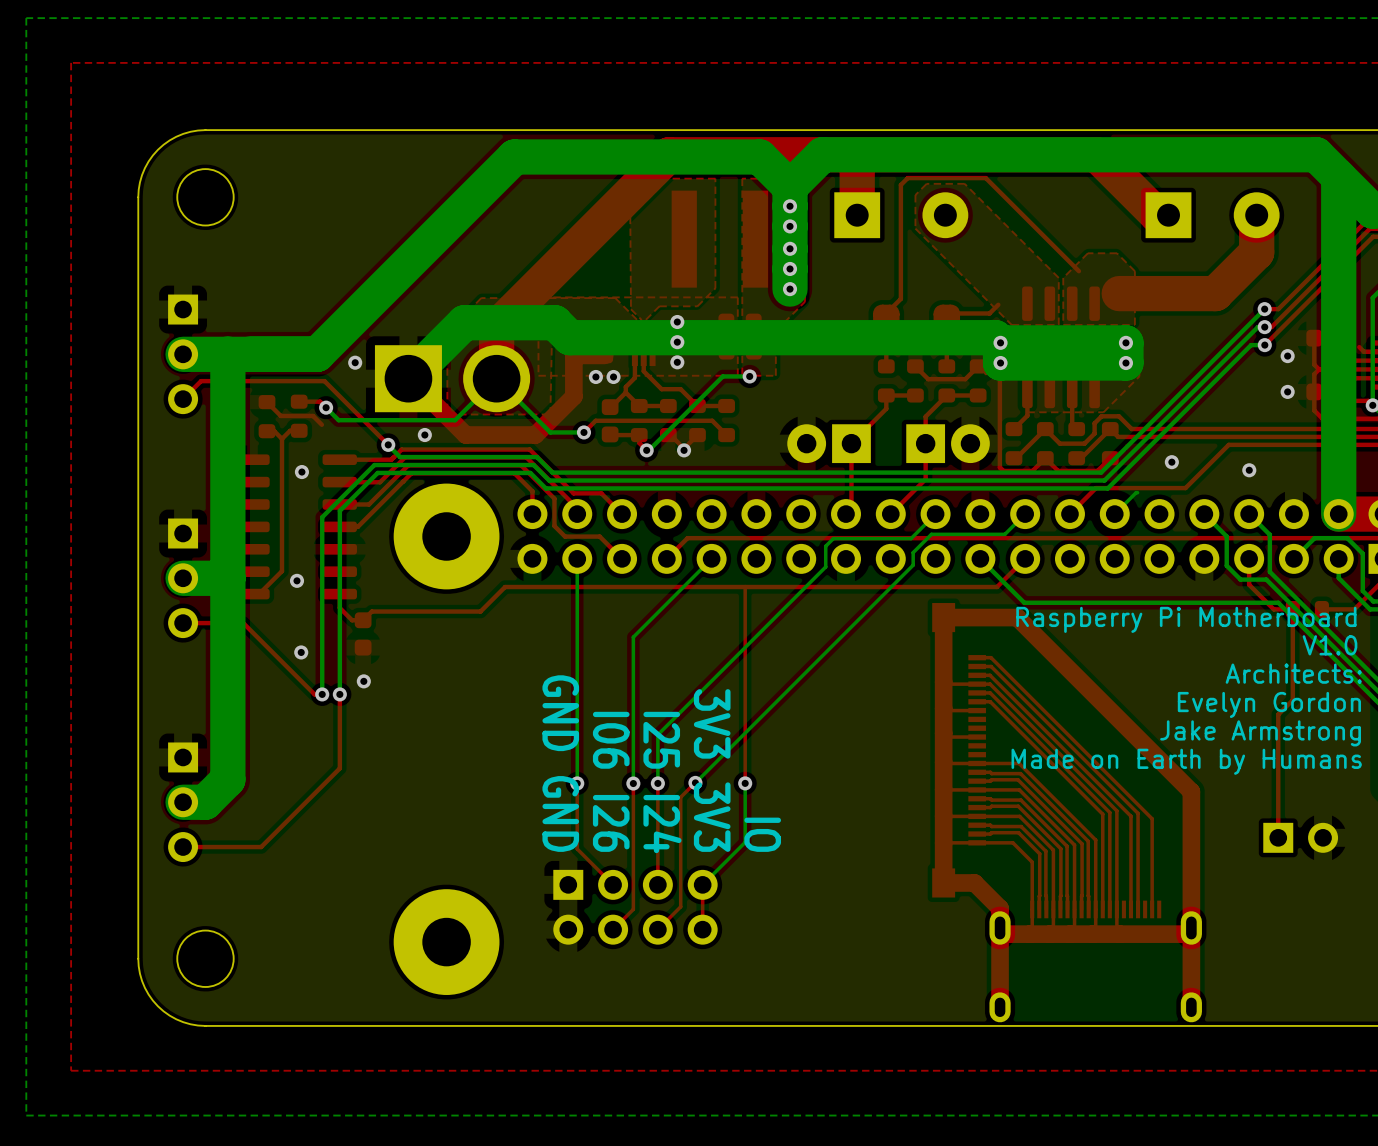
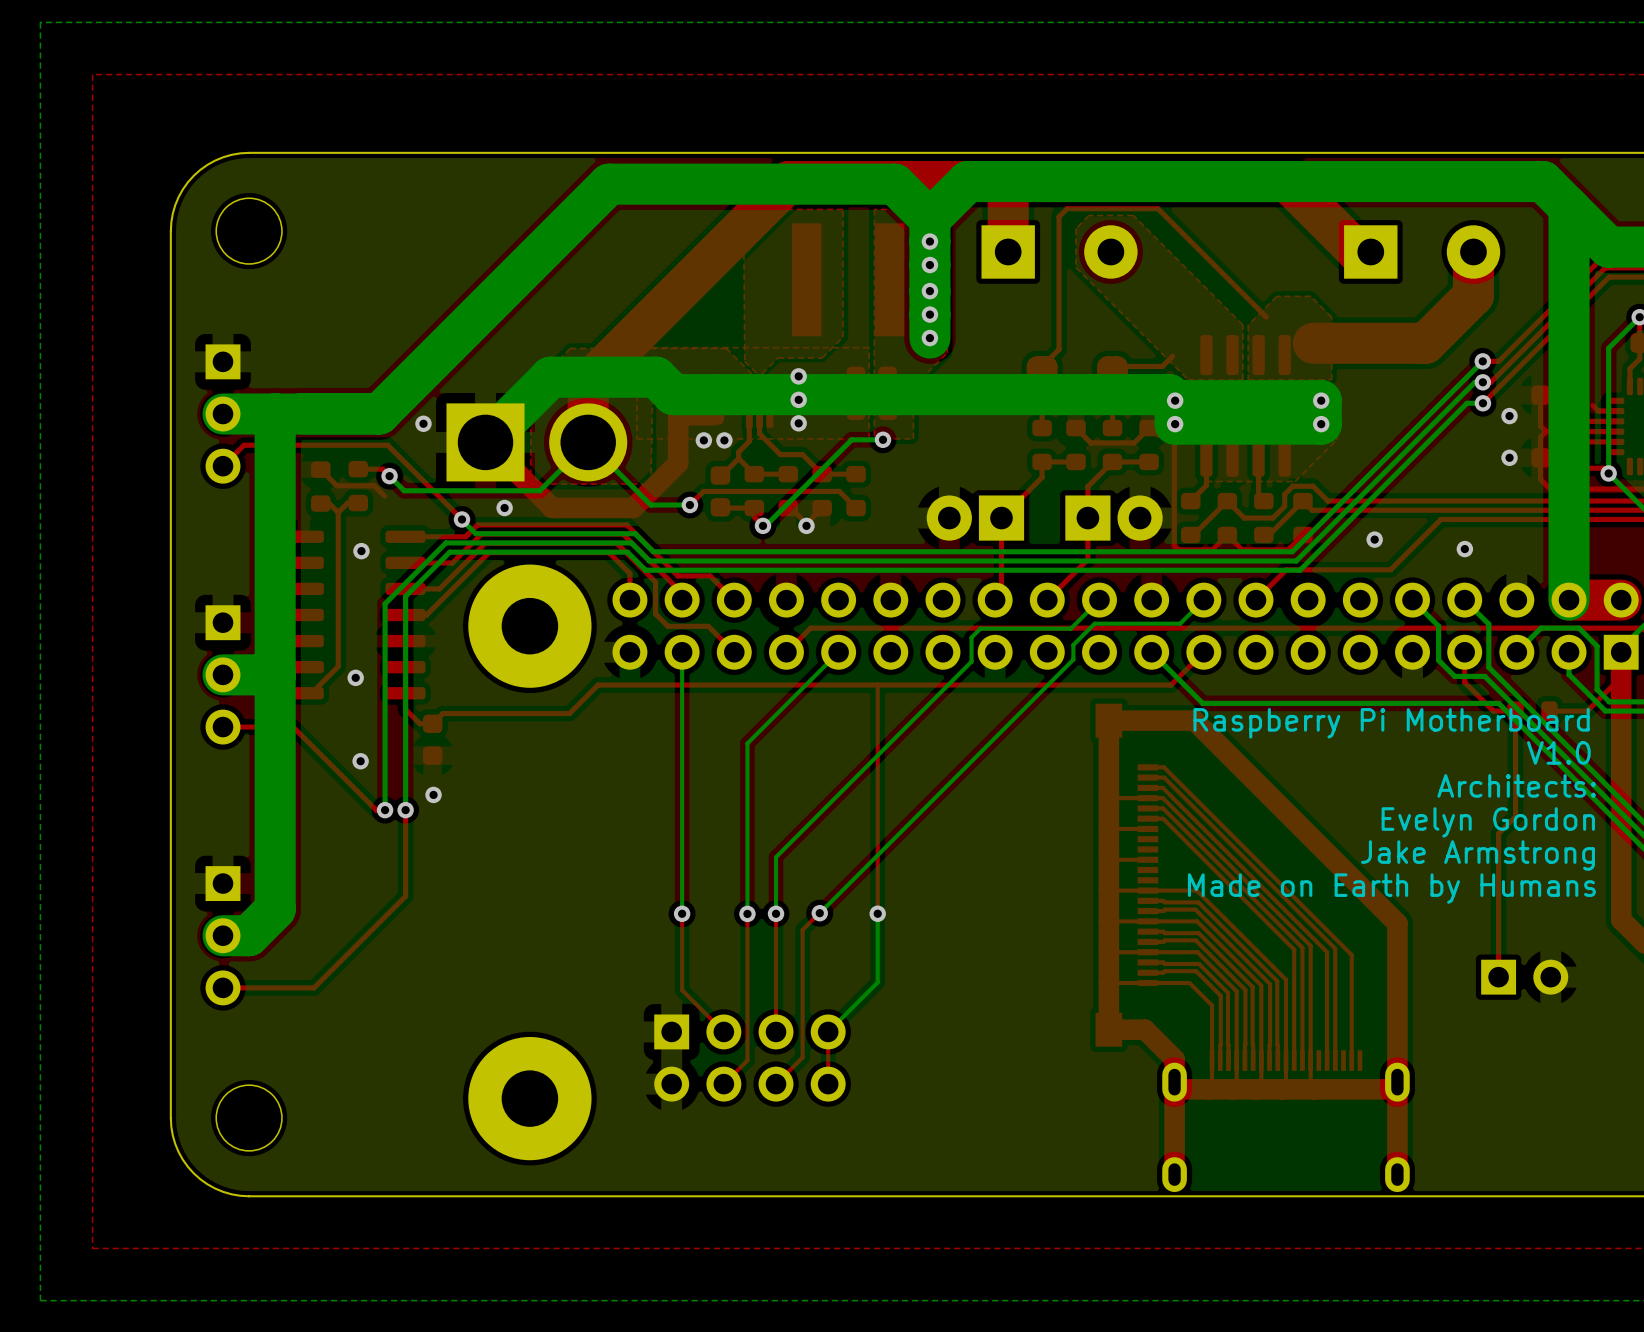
bottom track: (1137, 492) (1114, 514) -> none
text: GND GND (560, 763) -> none
text: 3V3 3V3 (712, 770) -> none
text: I06 I26 (611, 781) -> none
text: I25 I24 (662, 782) -> none
text: IO (762, 834) -> none

